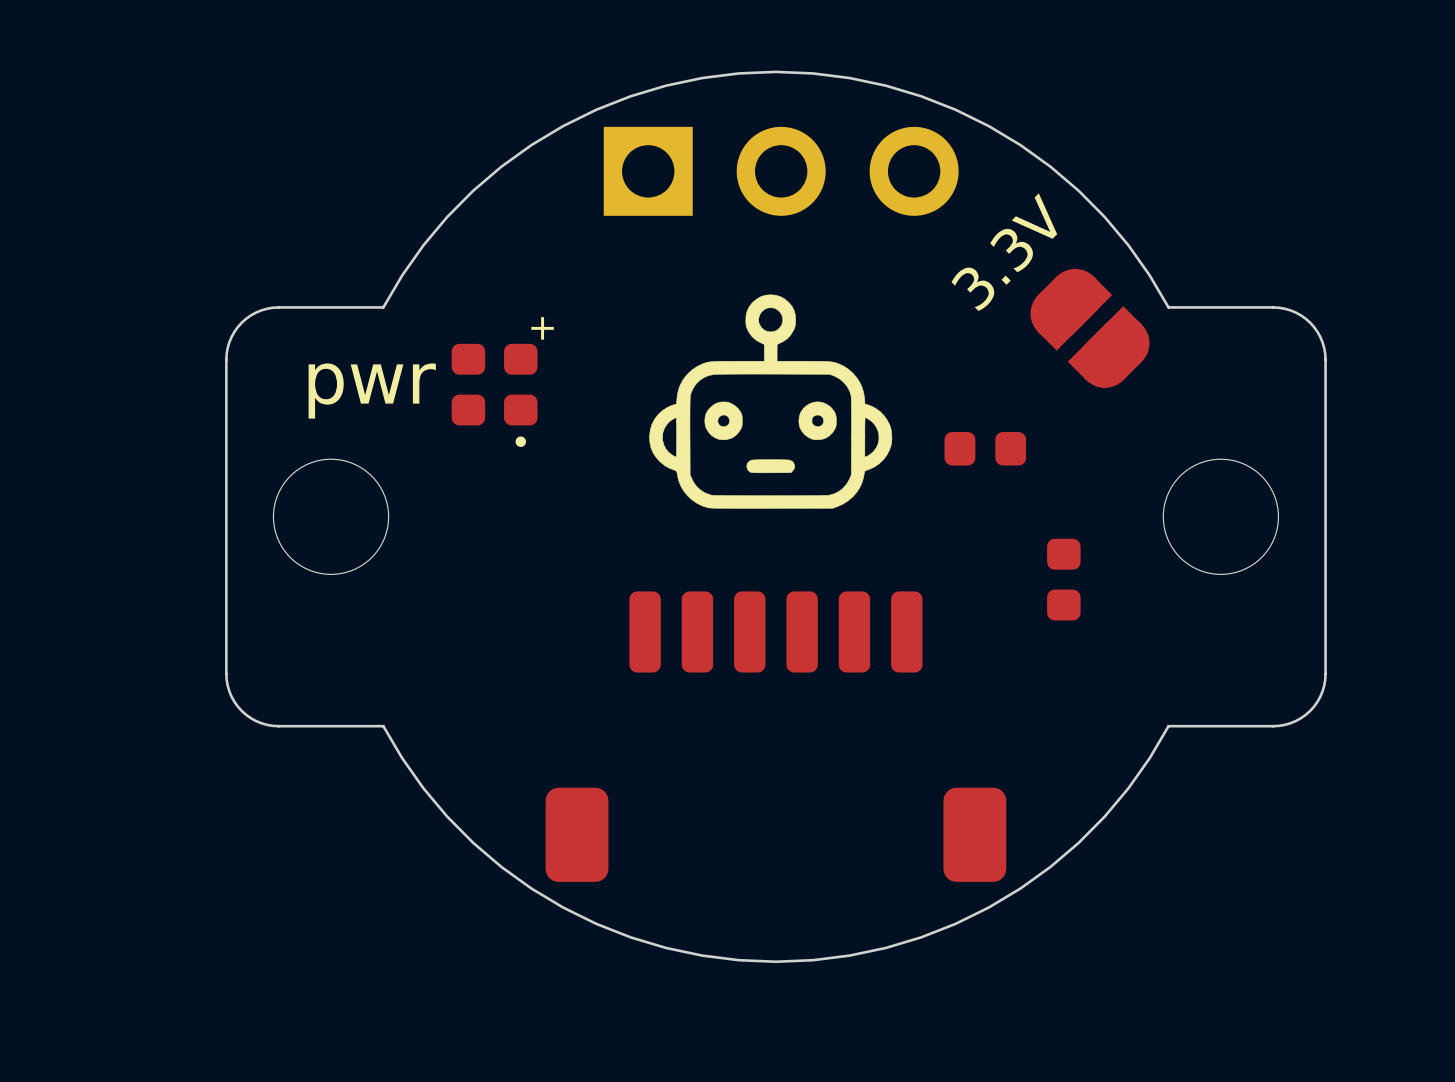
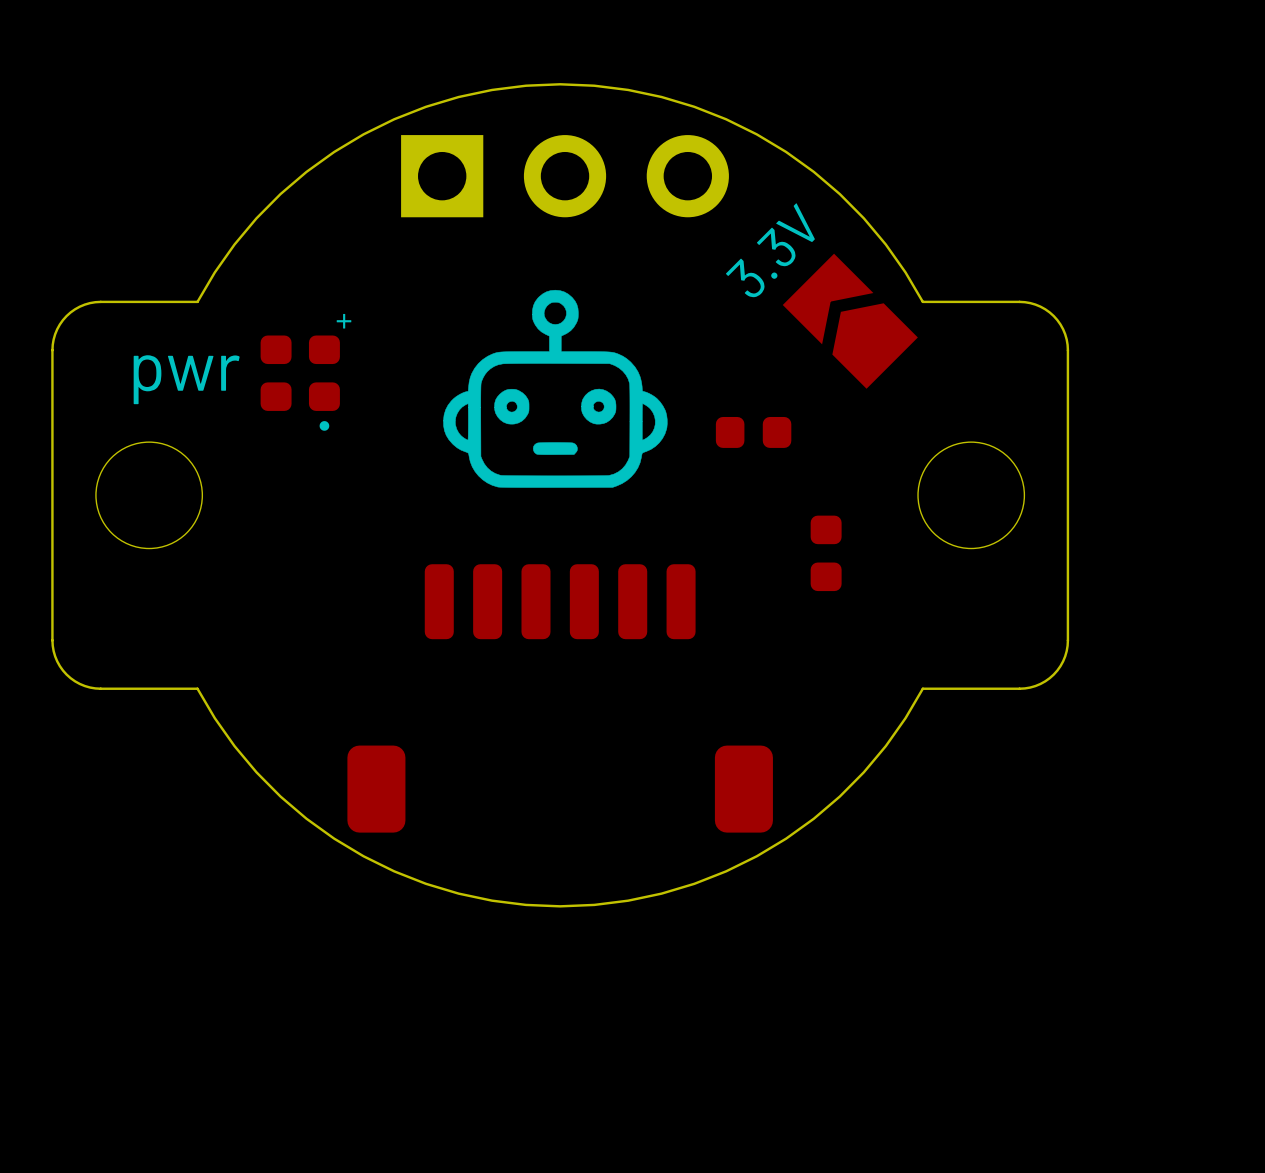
part footprint: [1030, 268, 1150, 388] -> [782, 253, 918, 389]

